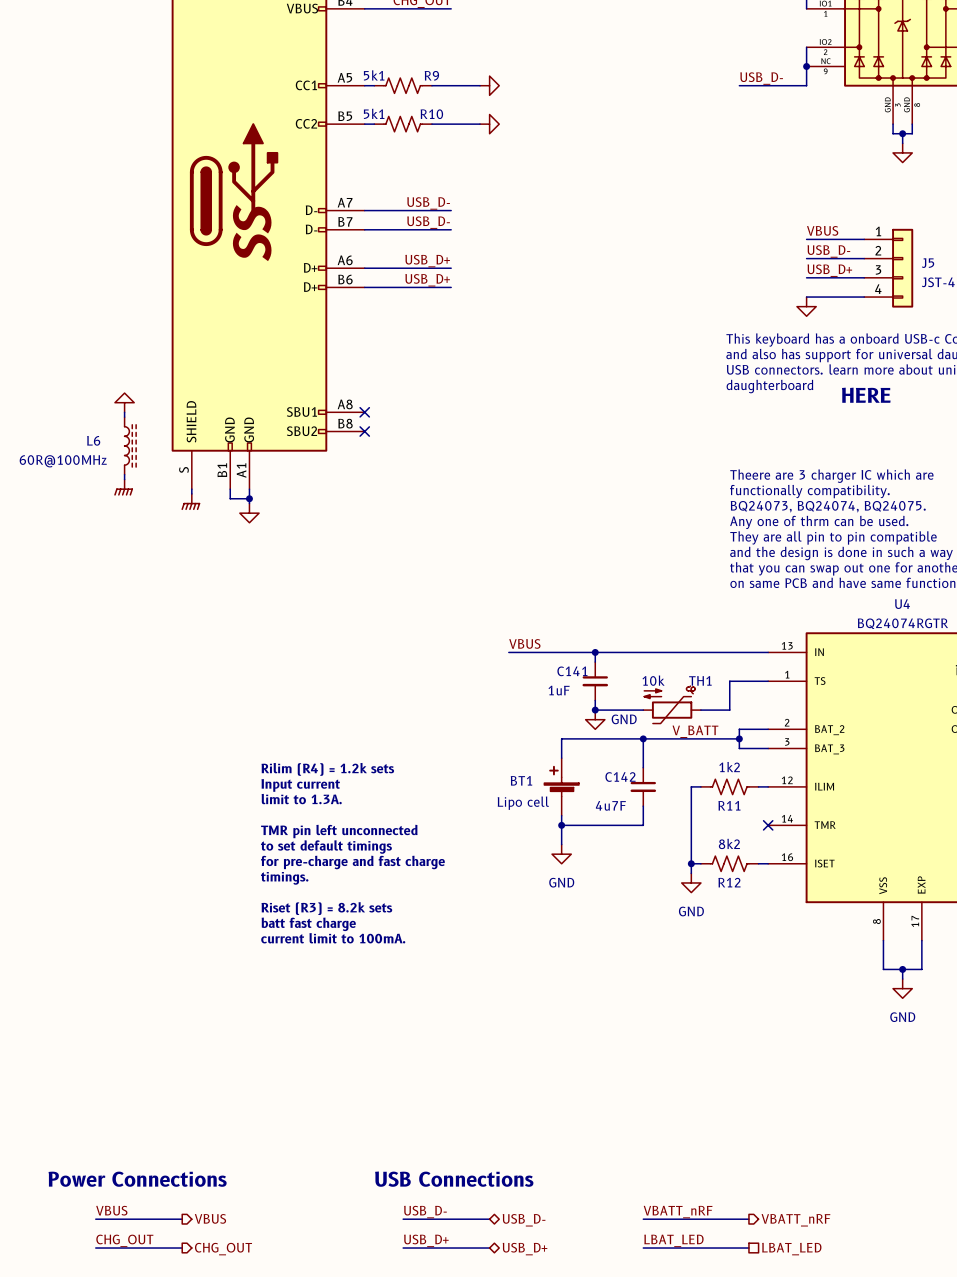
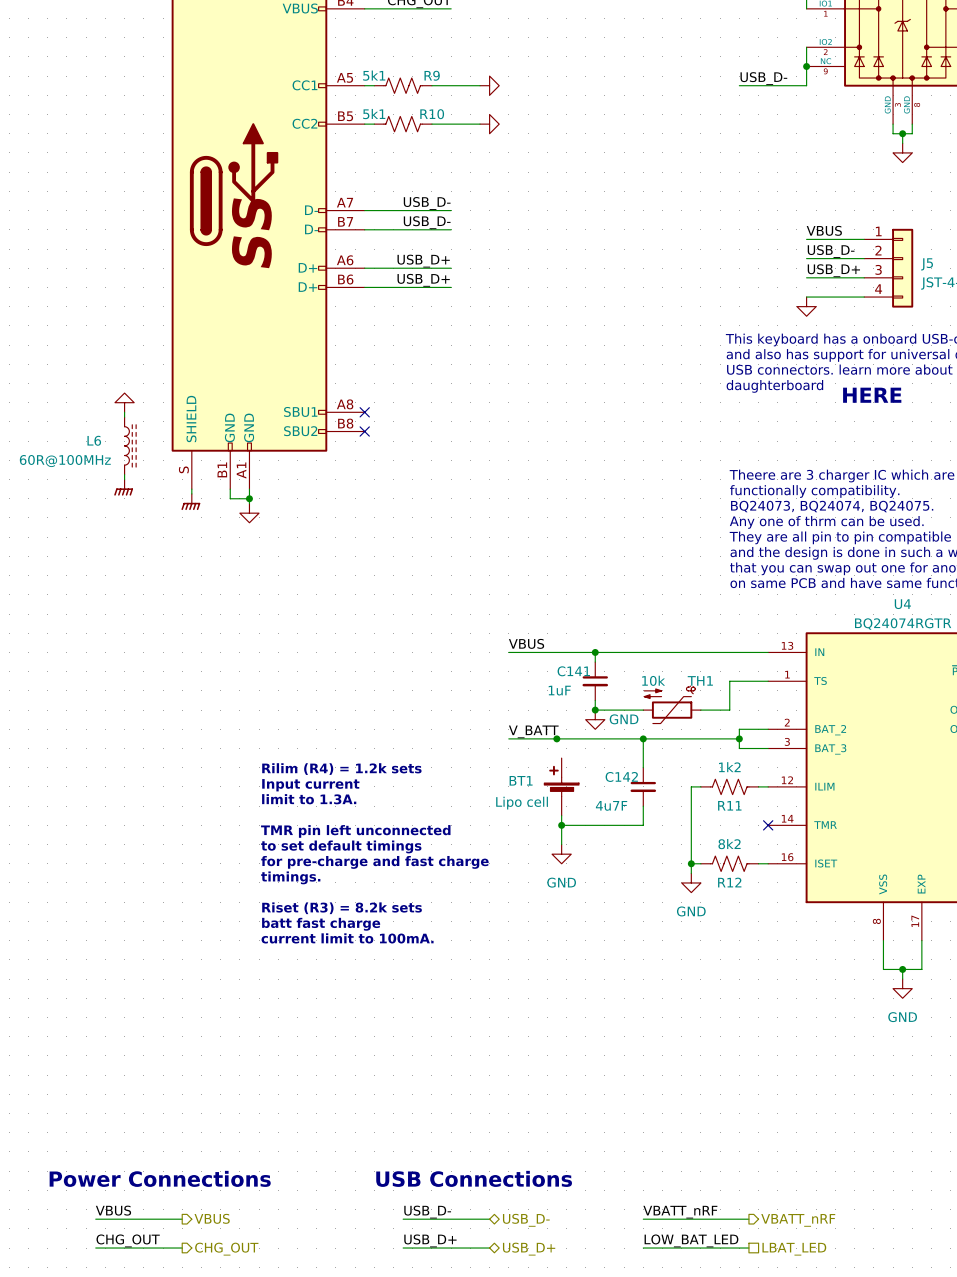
label position: V_BATT (695, 731) -> V_BATT (533, 731)
junction: none -> (556, 738)
wire: (561, 738) (561, 758) -> (561, 738) (508, 738)
label: LBAT_LED (673, 1240) -> LOW_BAT_LED (691, 1240)

